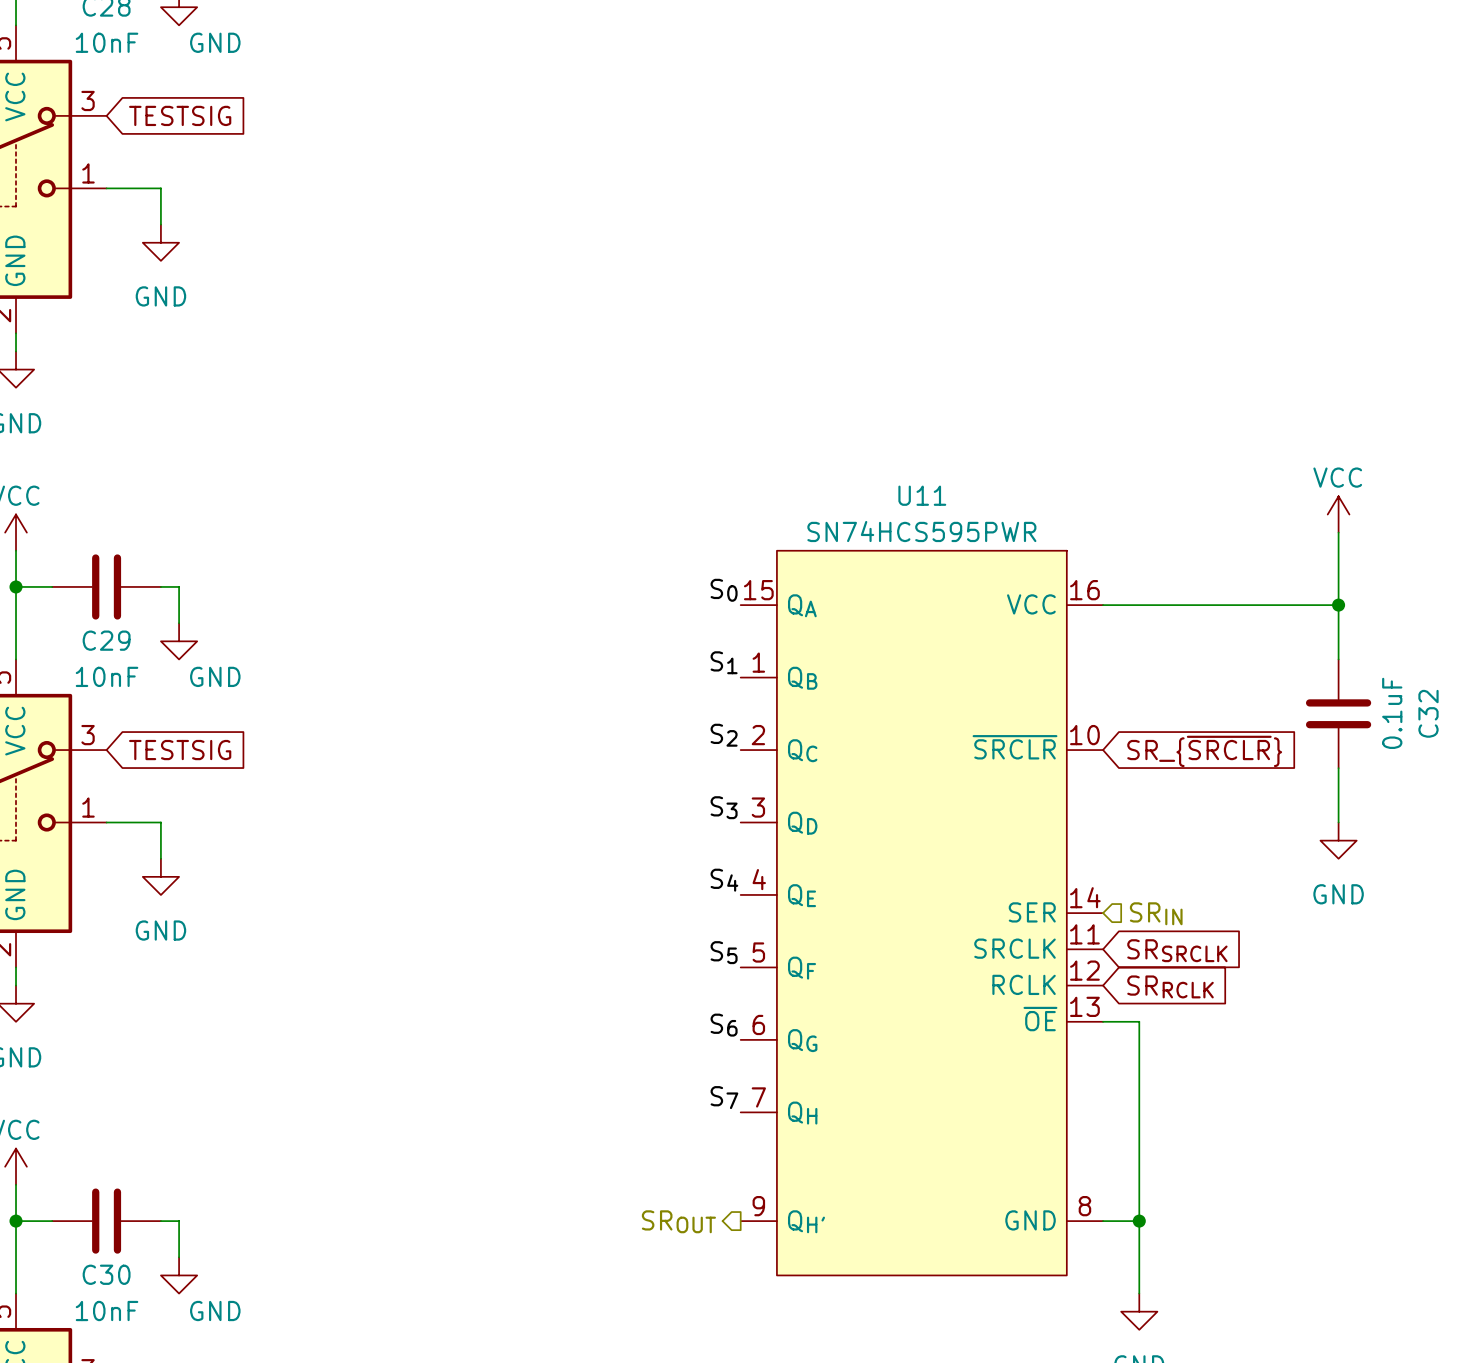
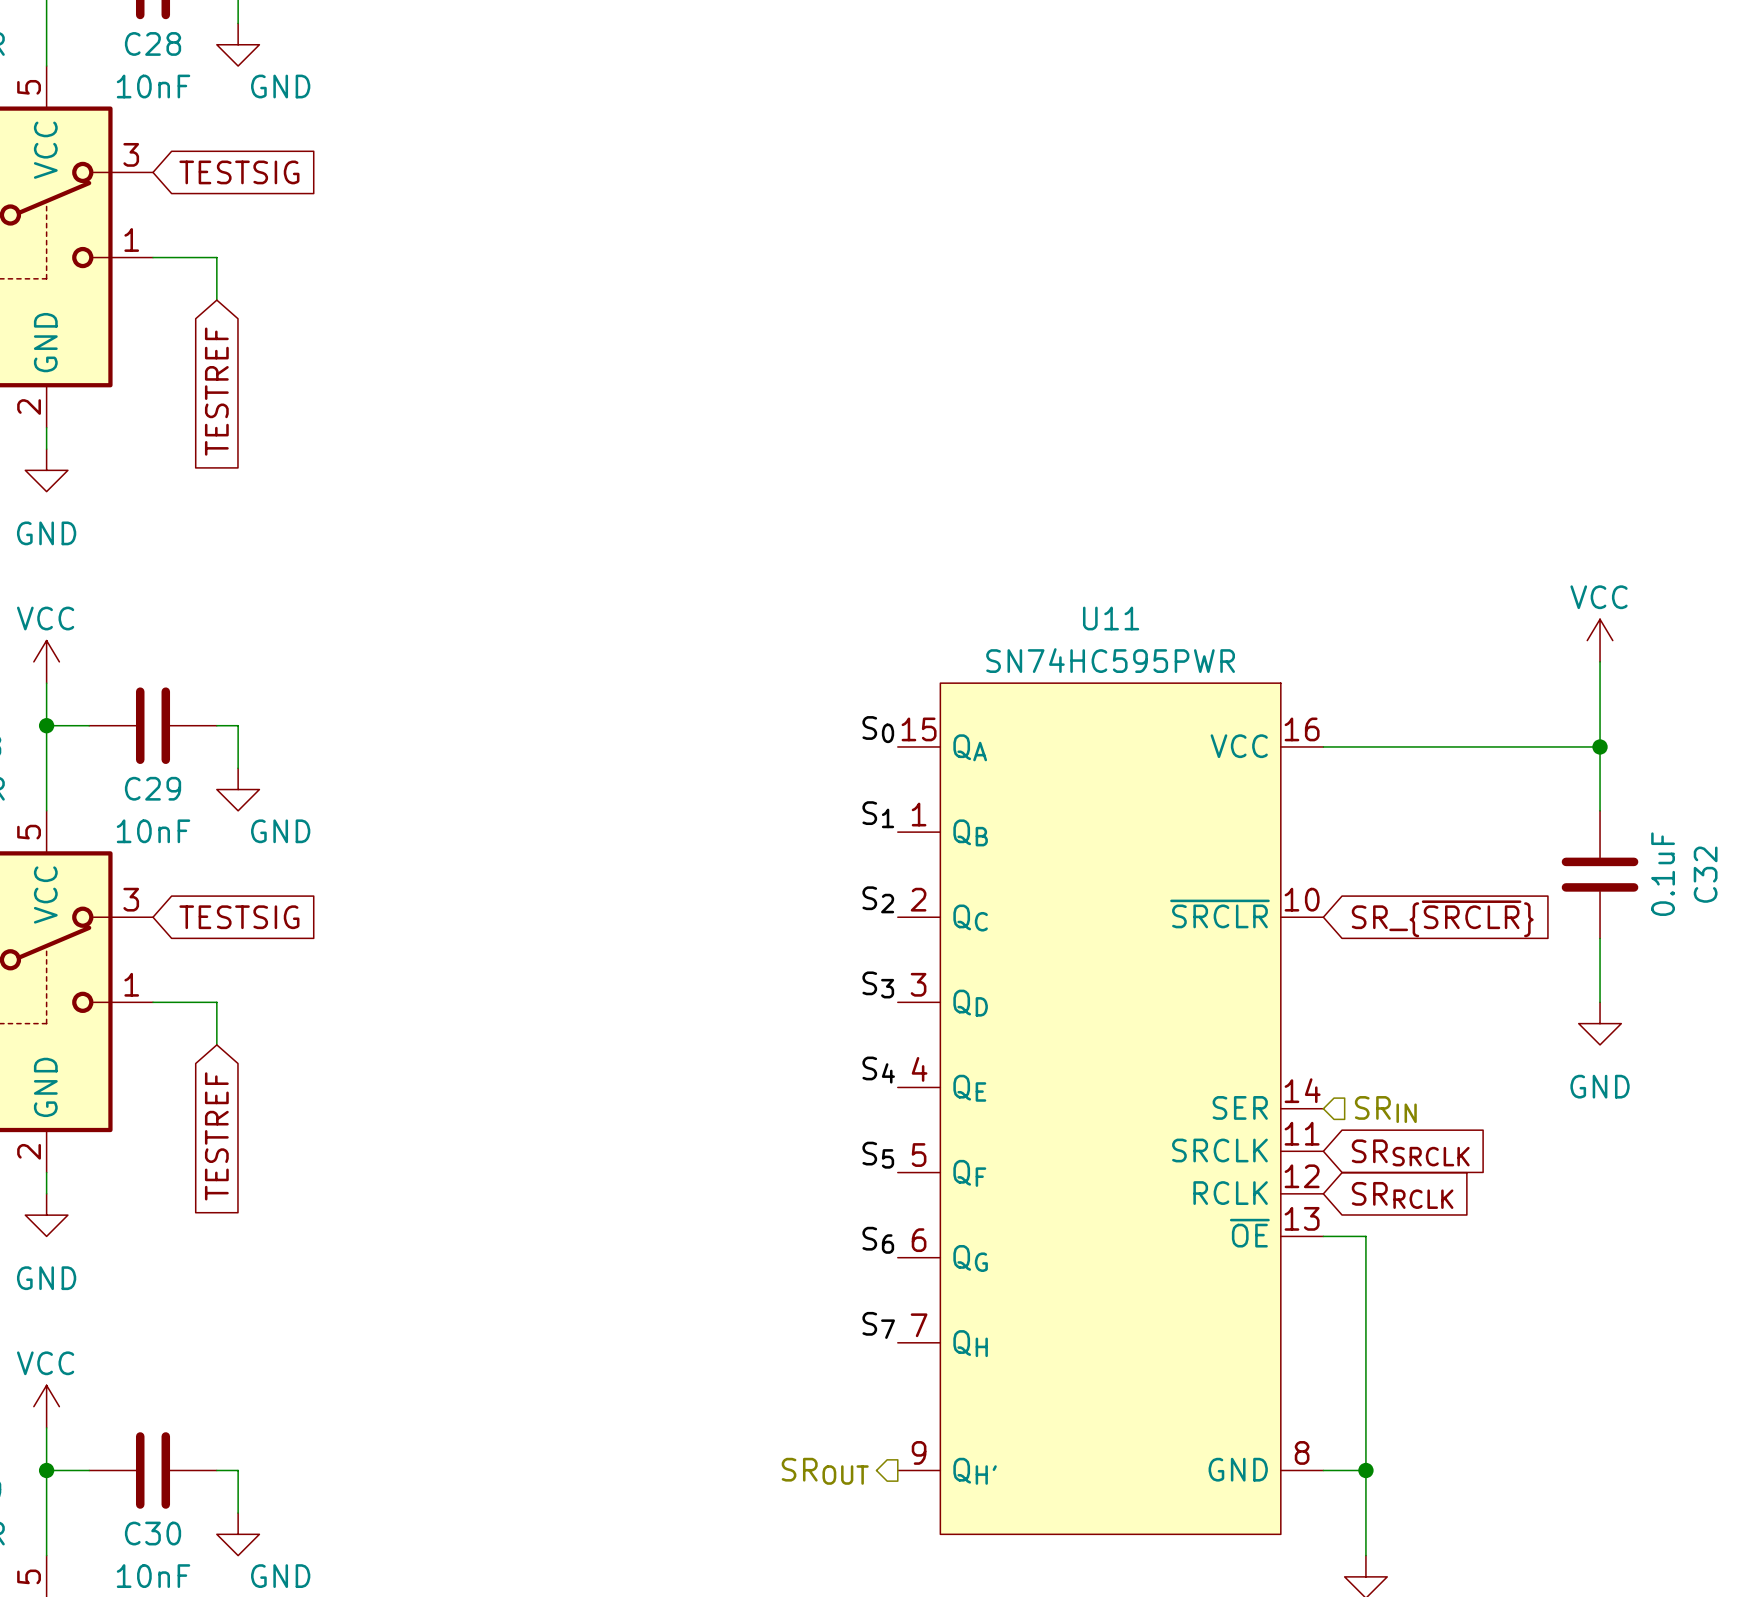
power symbol: GND (160, 242) -> none
global label: none -> TESTREF (216, 391)
U11 value: SN74HCS595PWR (921, 531) -> SN74HC595PWR (1110, 660)
power symbol: GND (160, 876) -> none
global label: none -> TESTREF (216, 1136)

